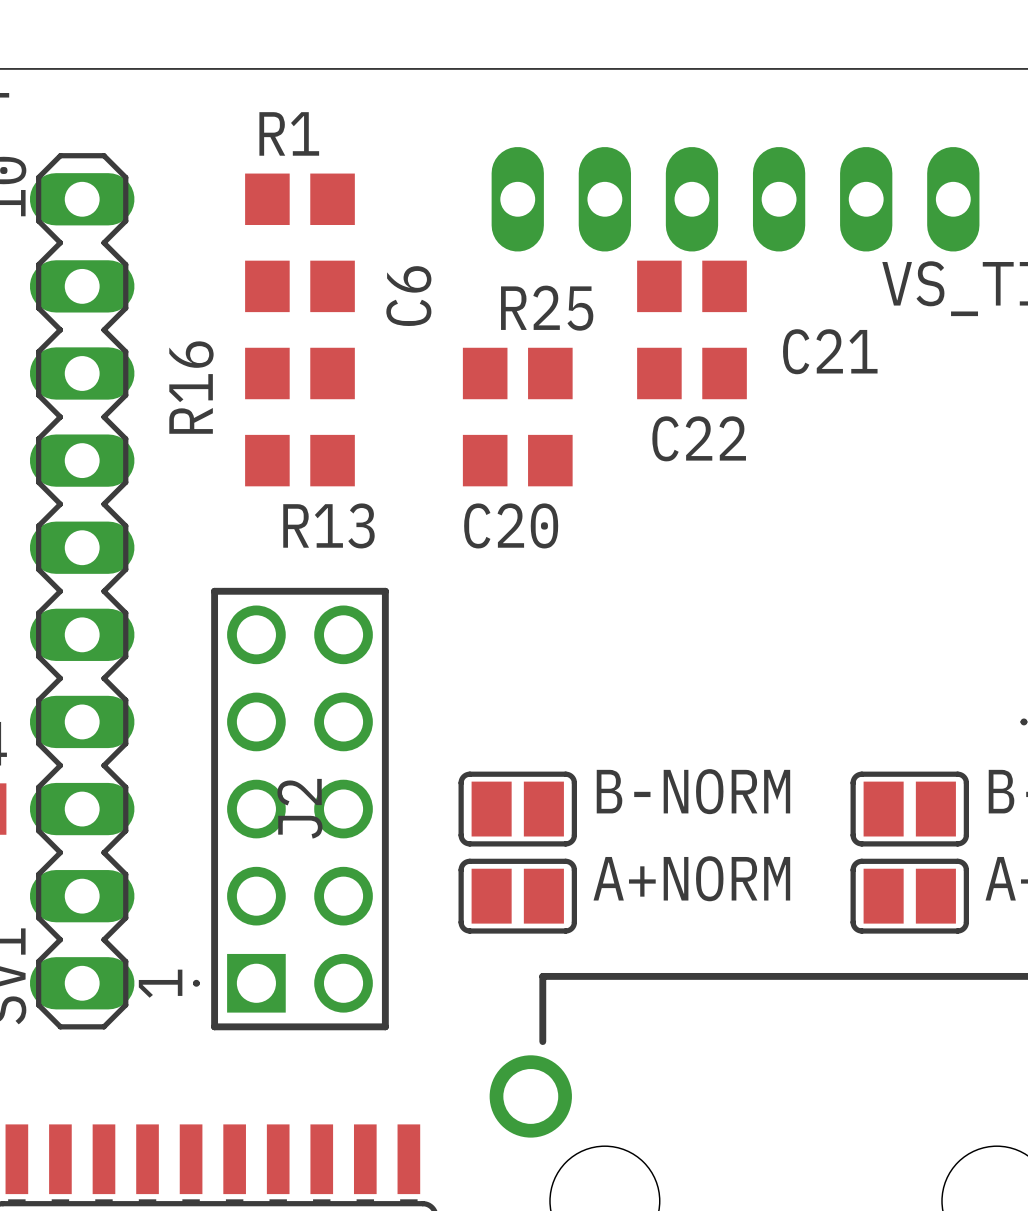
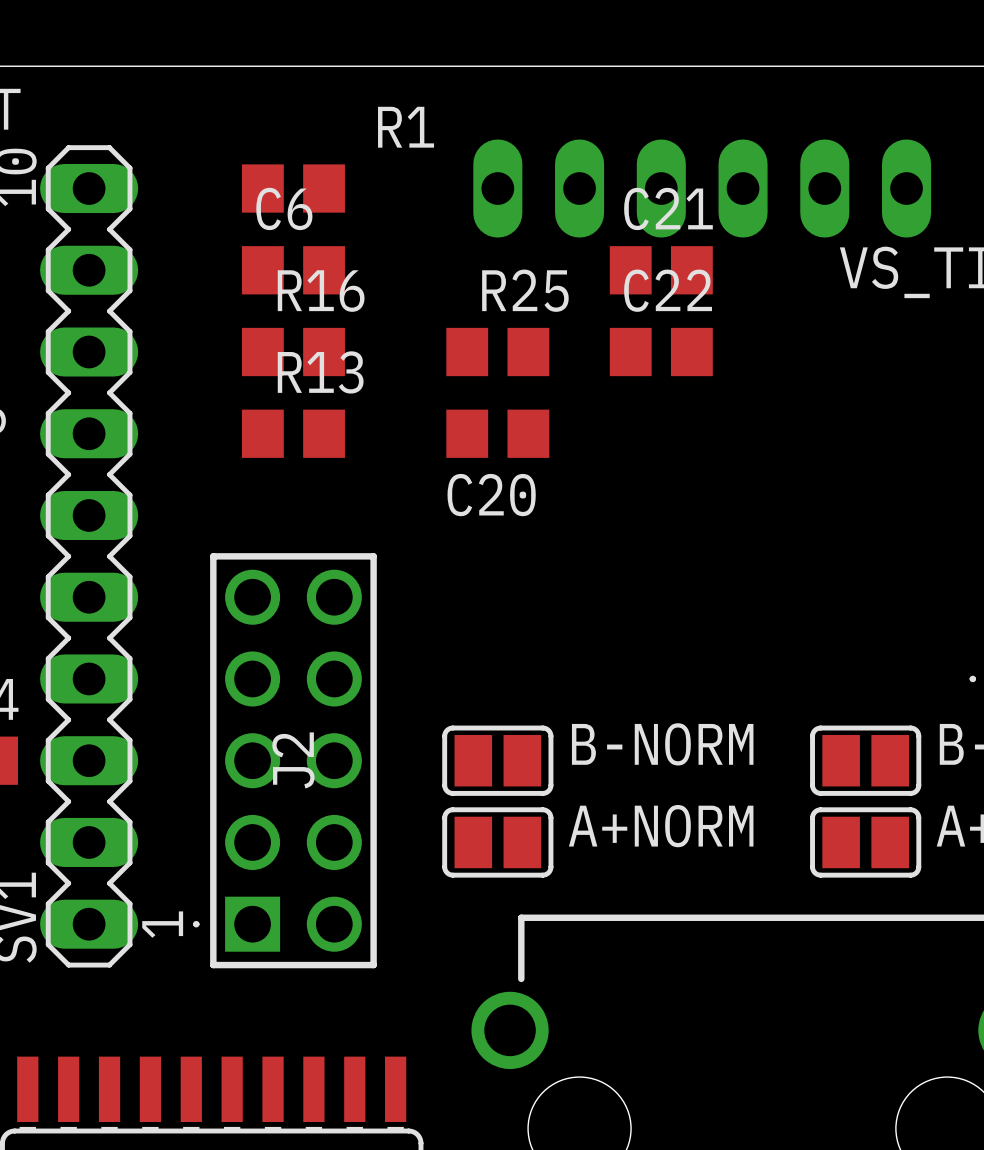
R1 name position: R1 (289, 133) -> R1 (406, 127)
C6 name rotation: 0° (408, 296) -> 90° clockwise (284, 208)
C6 name position: C6 (408, 296) -> C6 (284, 208)
C21 name position: C21 (830, 351) -> C21 (668, 208)
R16 name rotation: 0° (191, 387) -> 90° clockwise (321, 291)
R16 name position: R16 (191, 387) -> R16 (321, 291)
C22 name position: C22 (699, 438) -> C22 (668, 290)
R13 name position: R13 (328, 525) -> R13 (320, 372)

